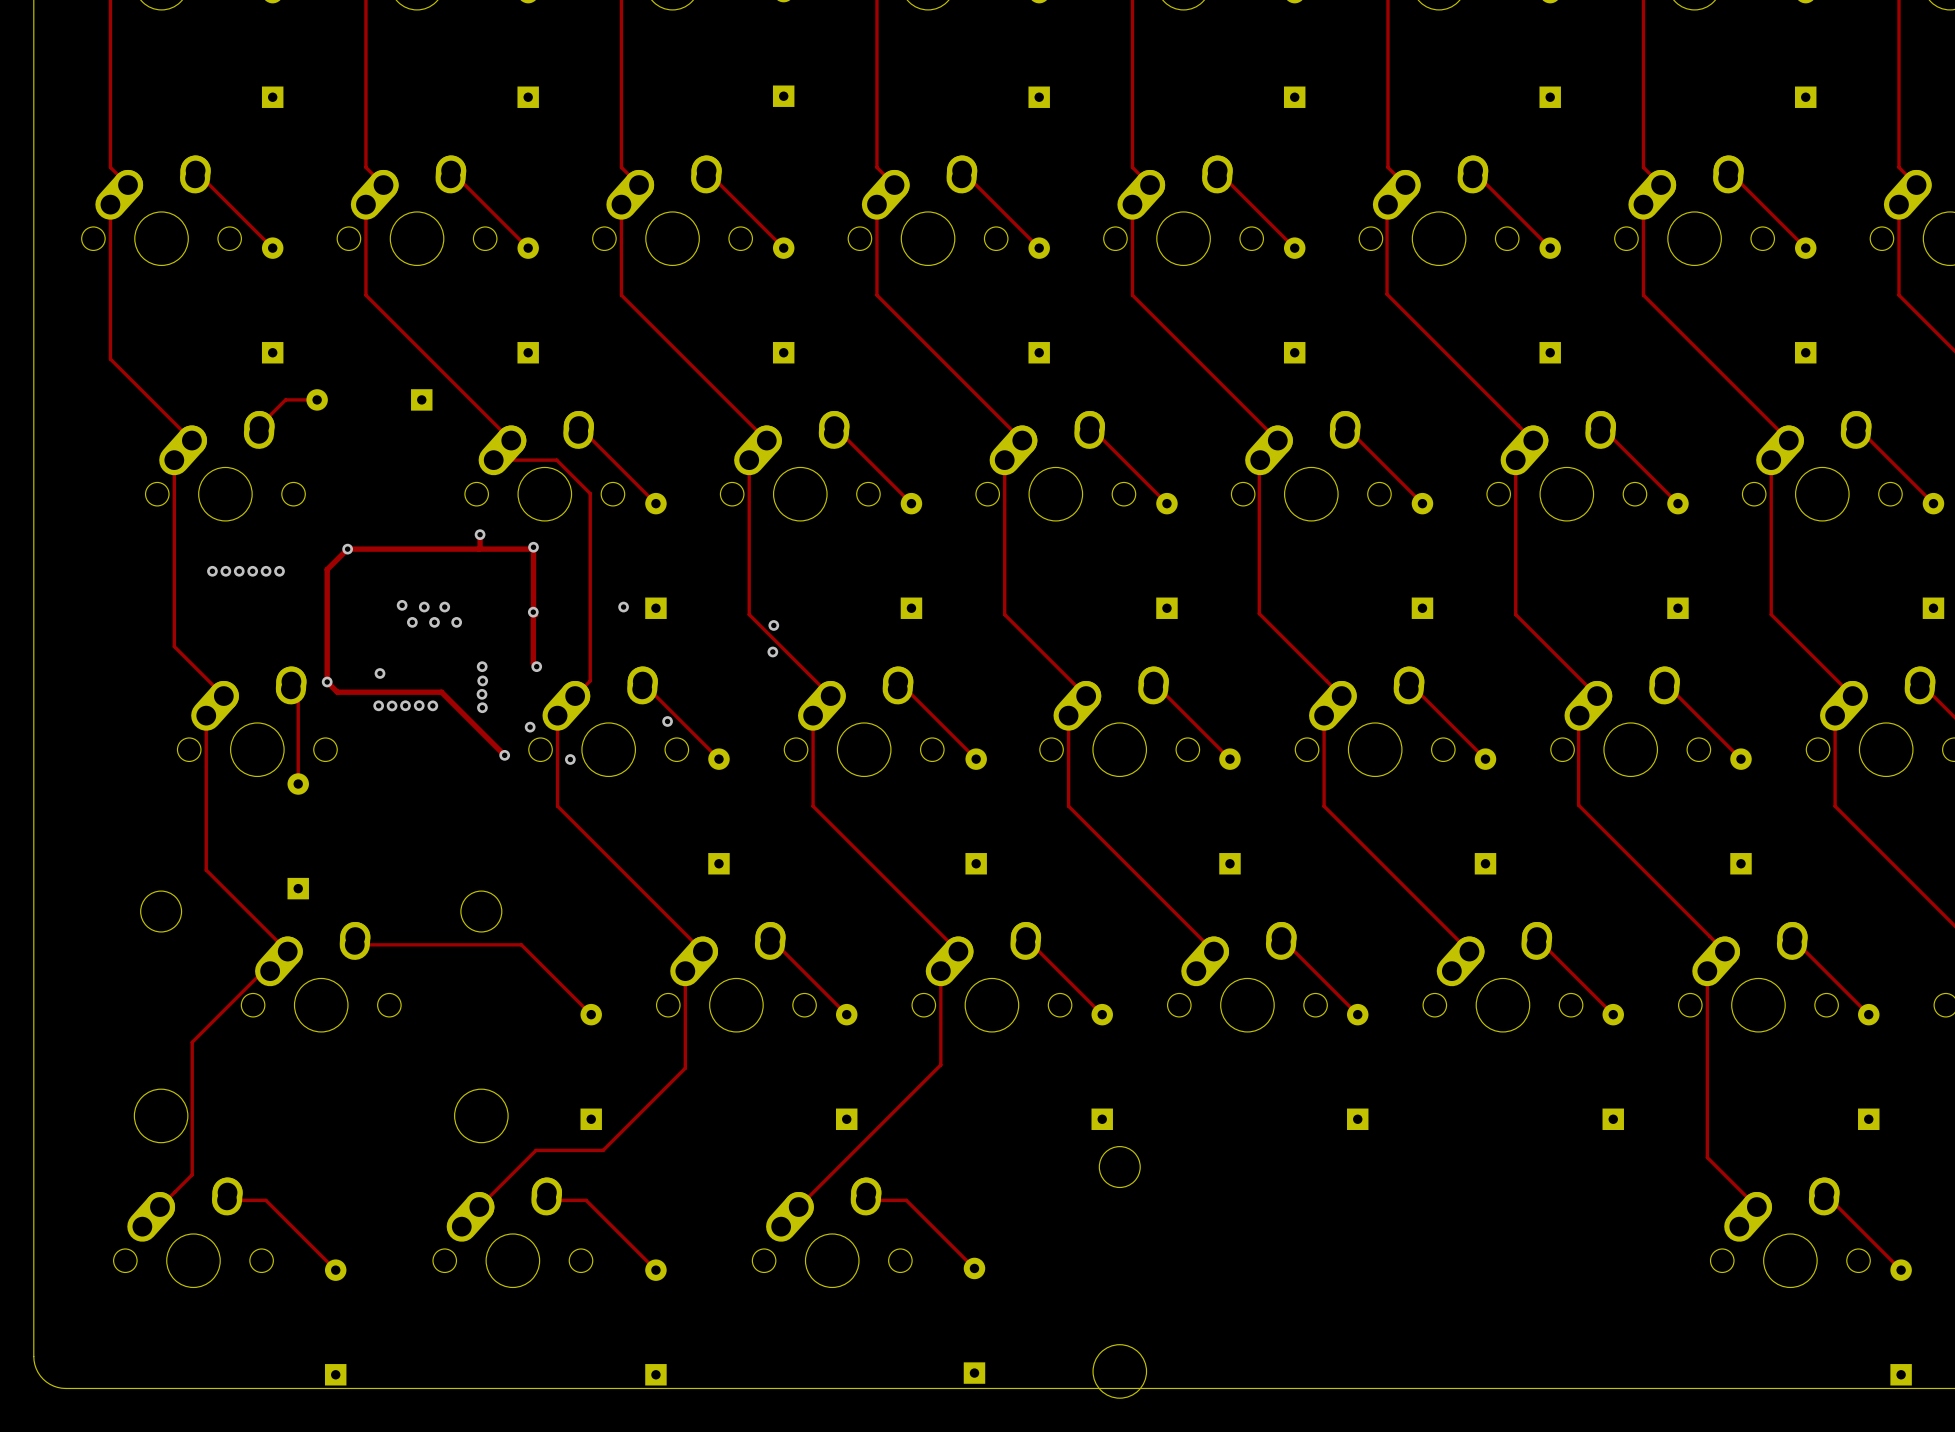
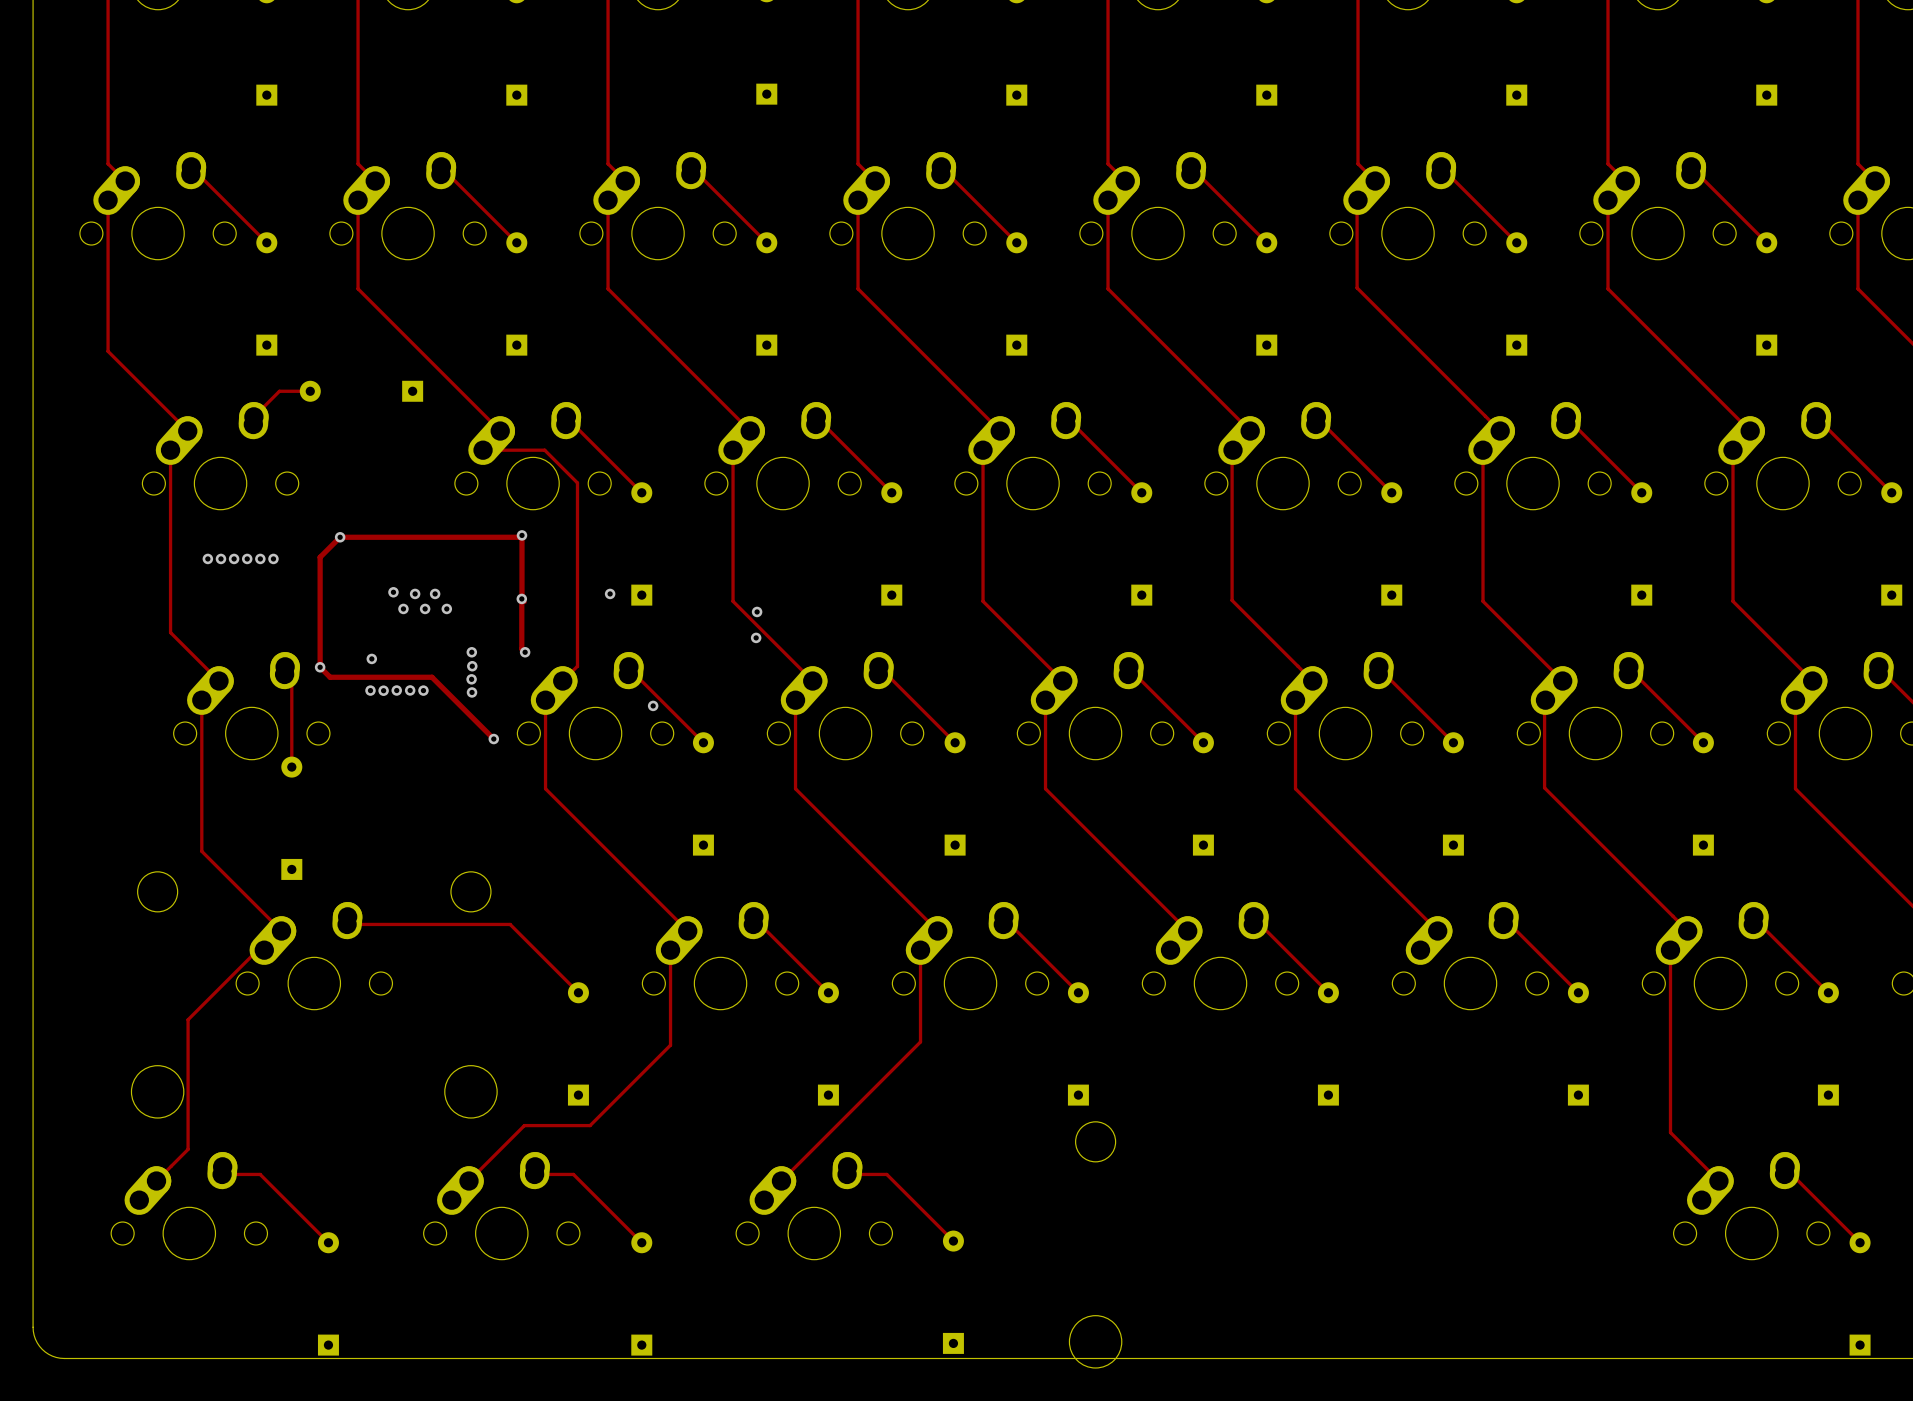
track: (480, 534) (479, 549) -> none
via: (480, 534) -> none
via: (530, 727) -> none
via: (570, 759) -> none

